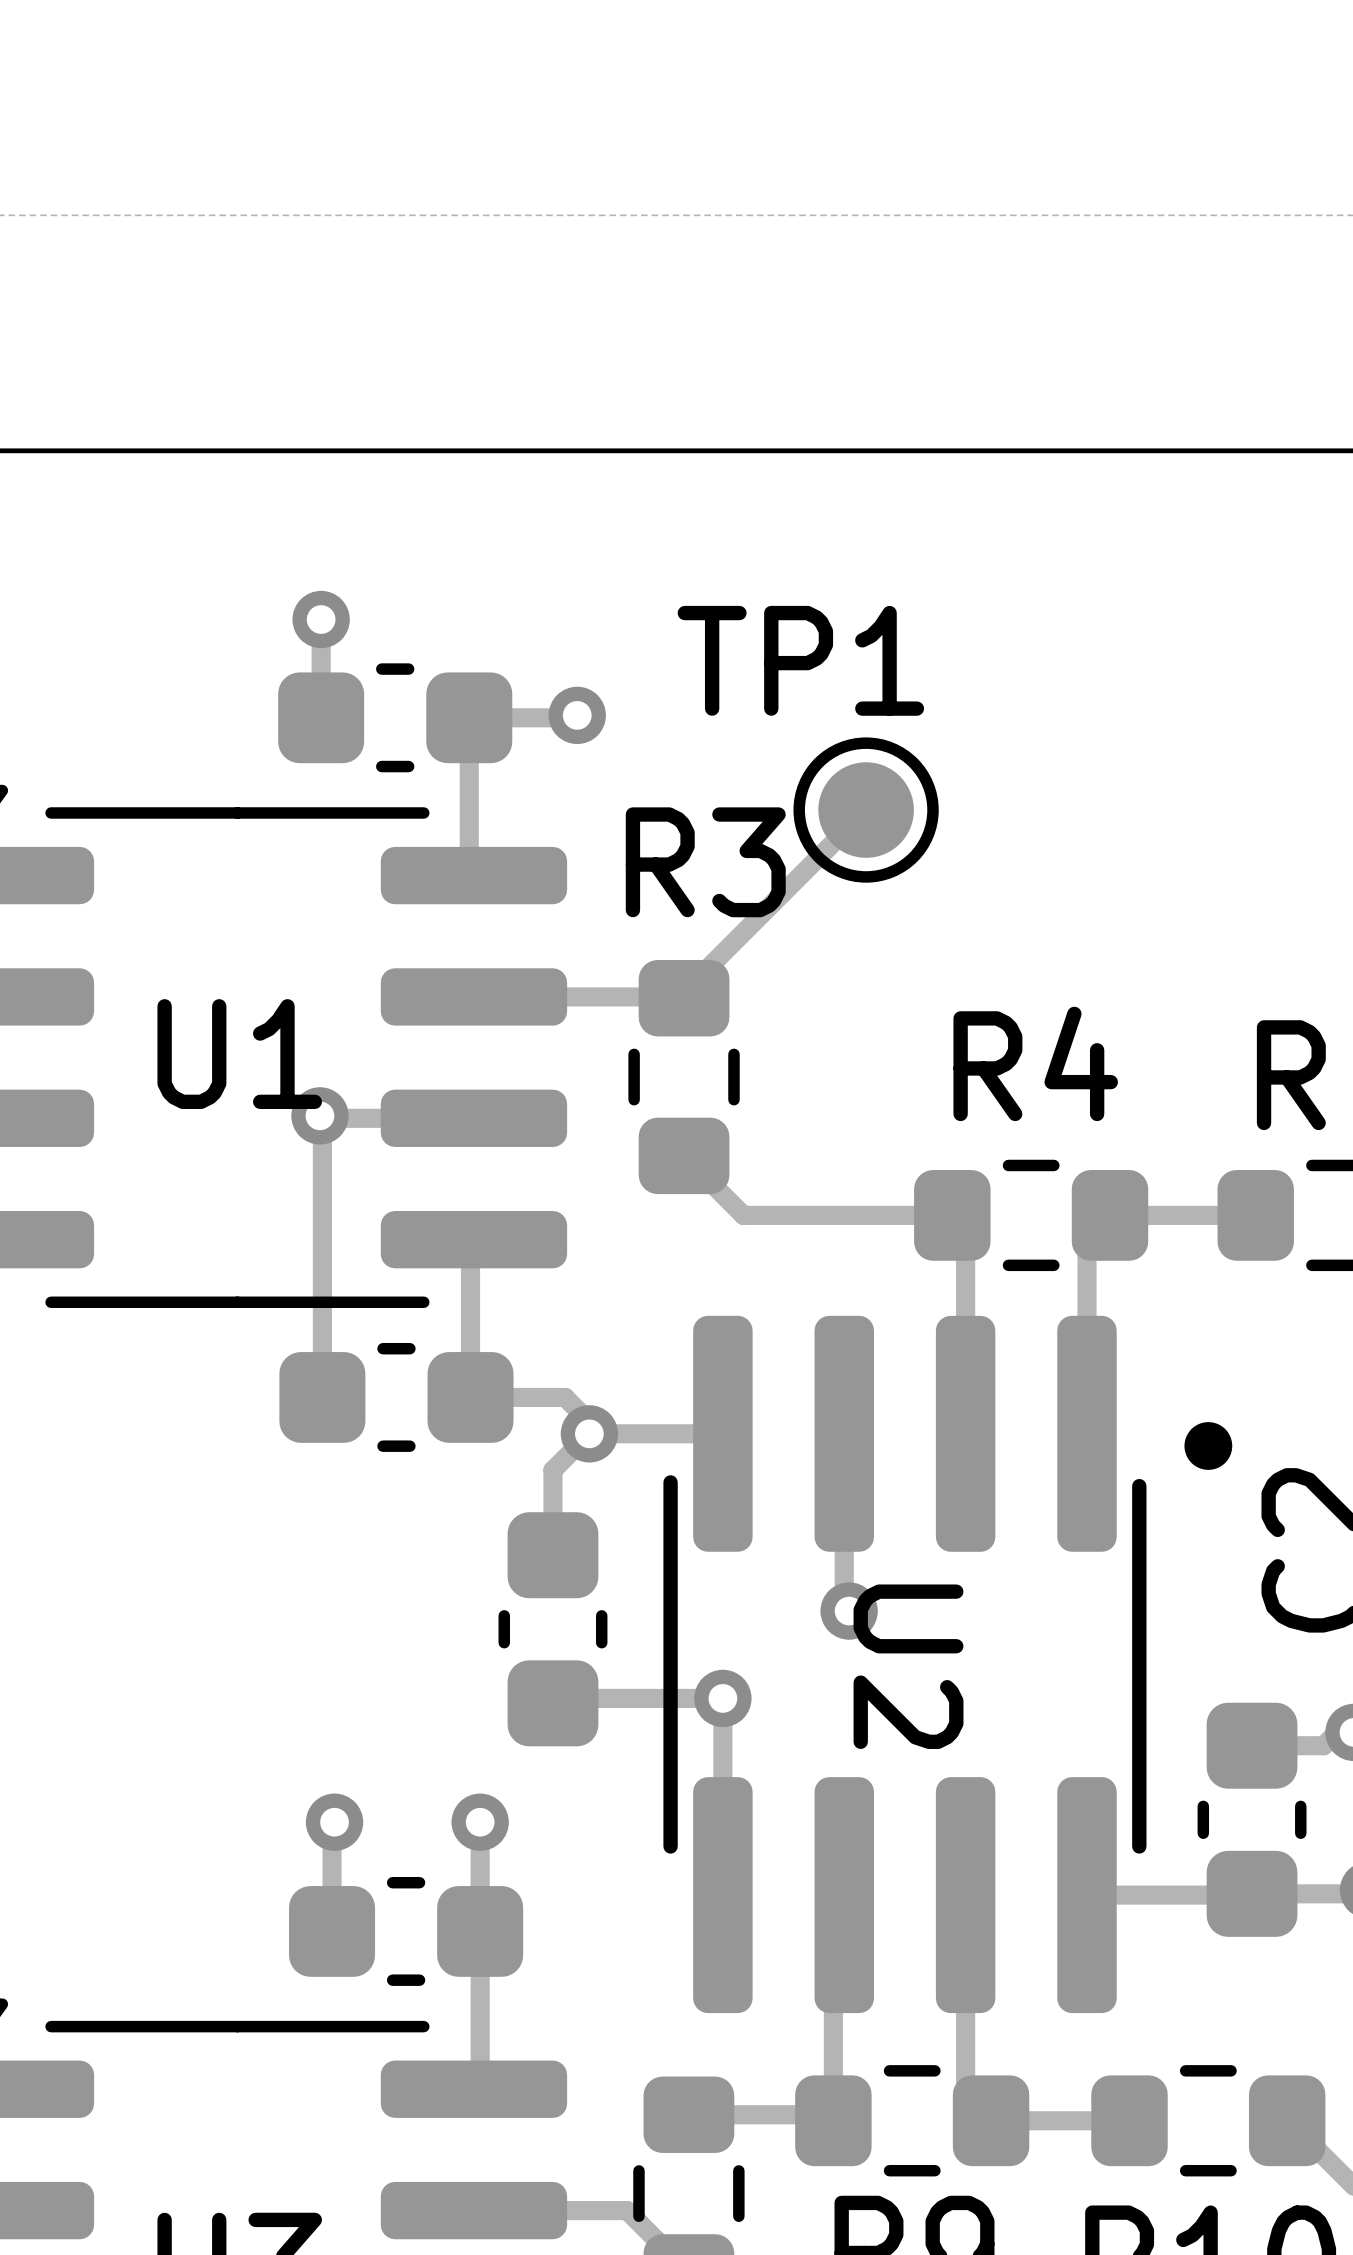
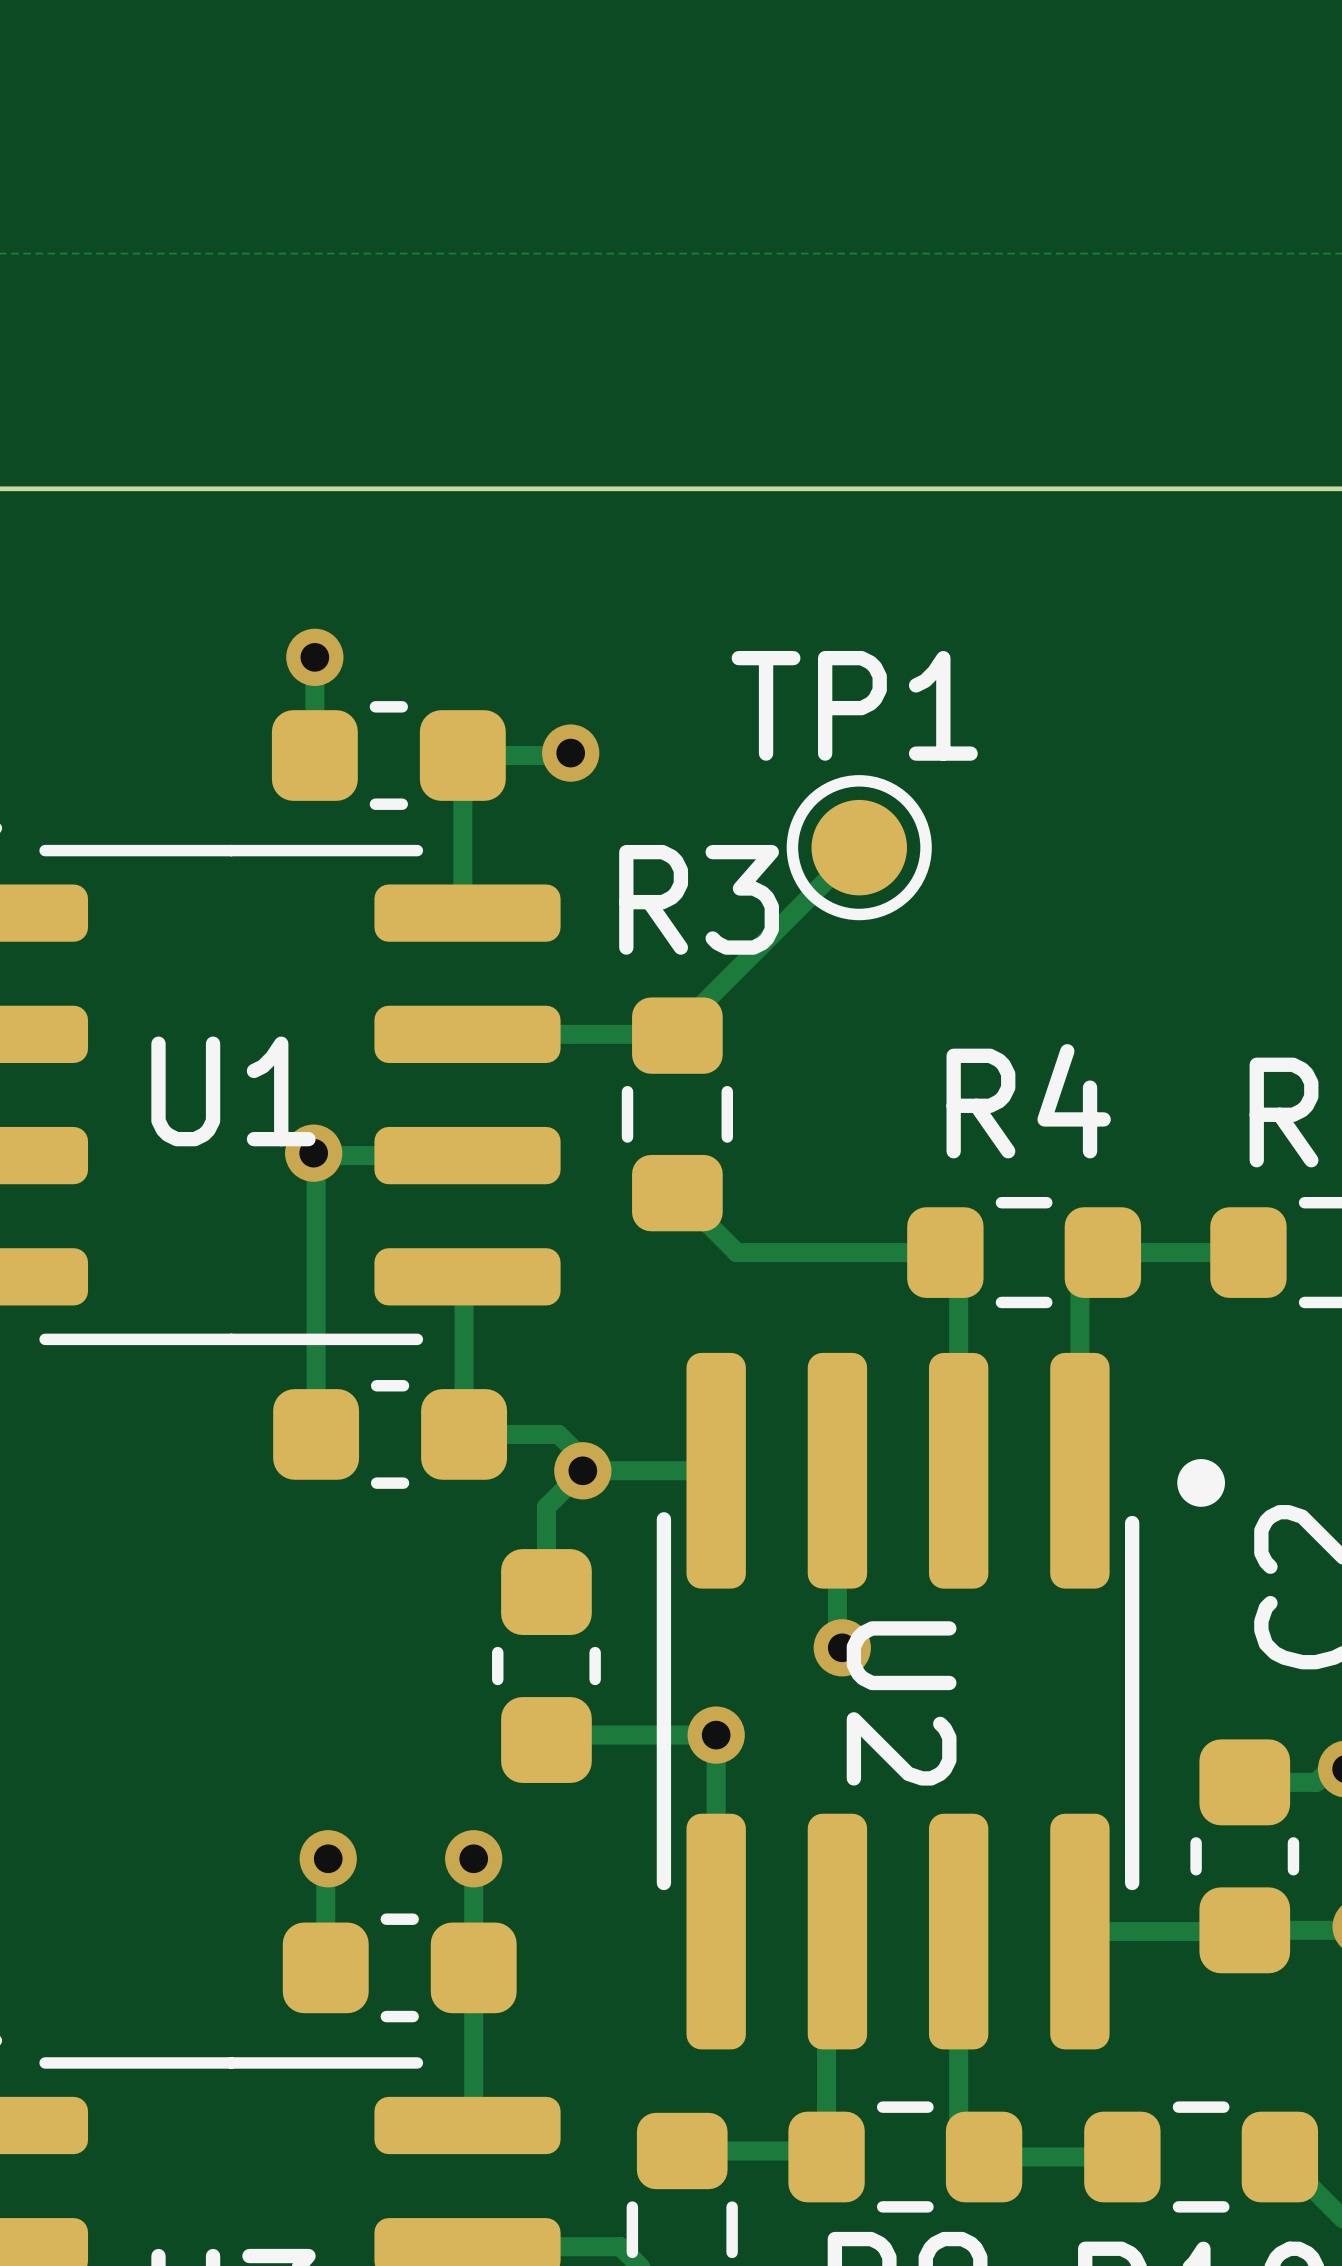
TP1 name position: TP1 (800, 660) -> TP1 (854, 705)

